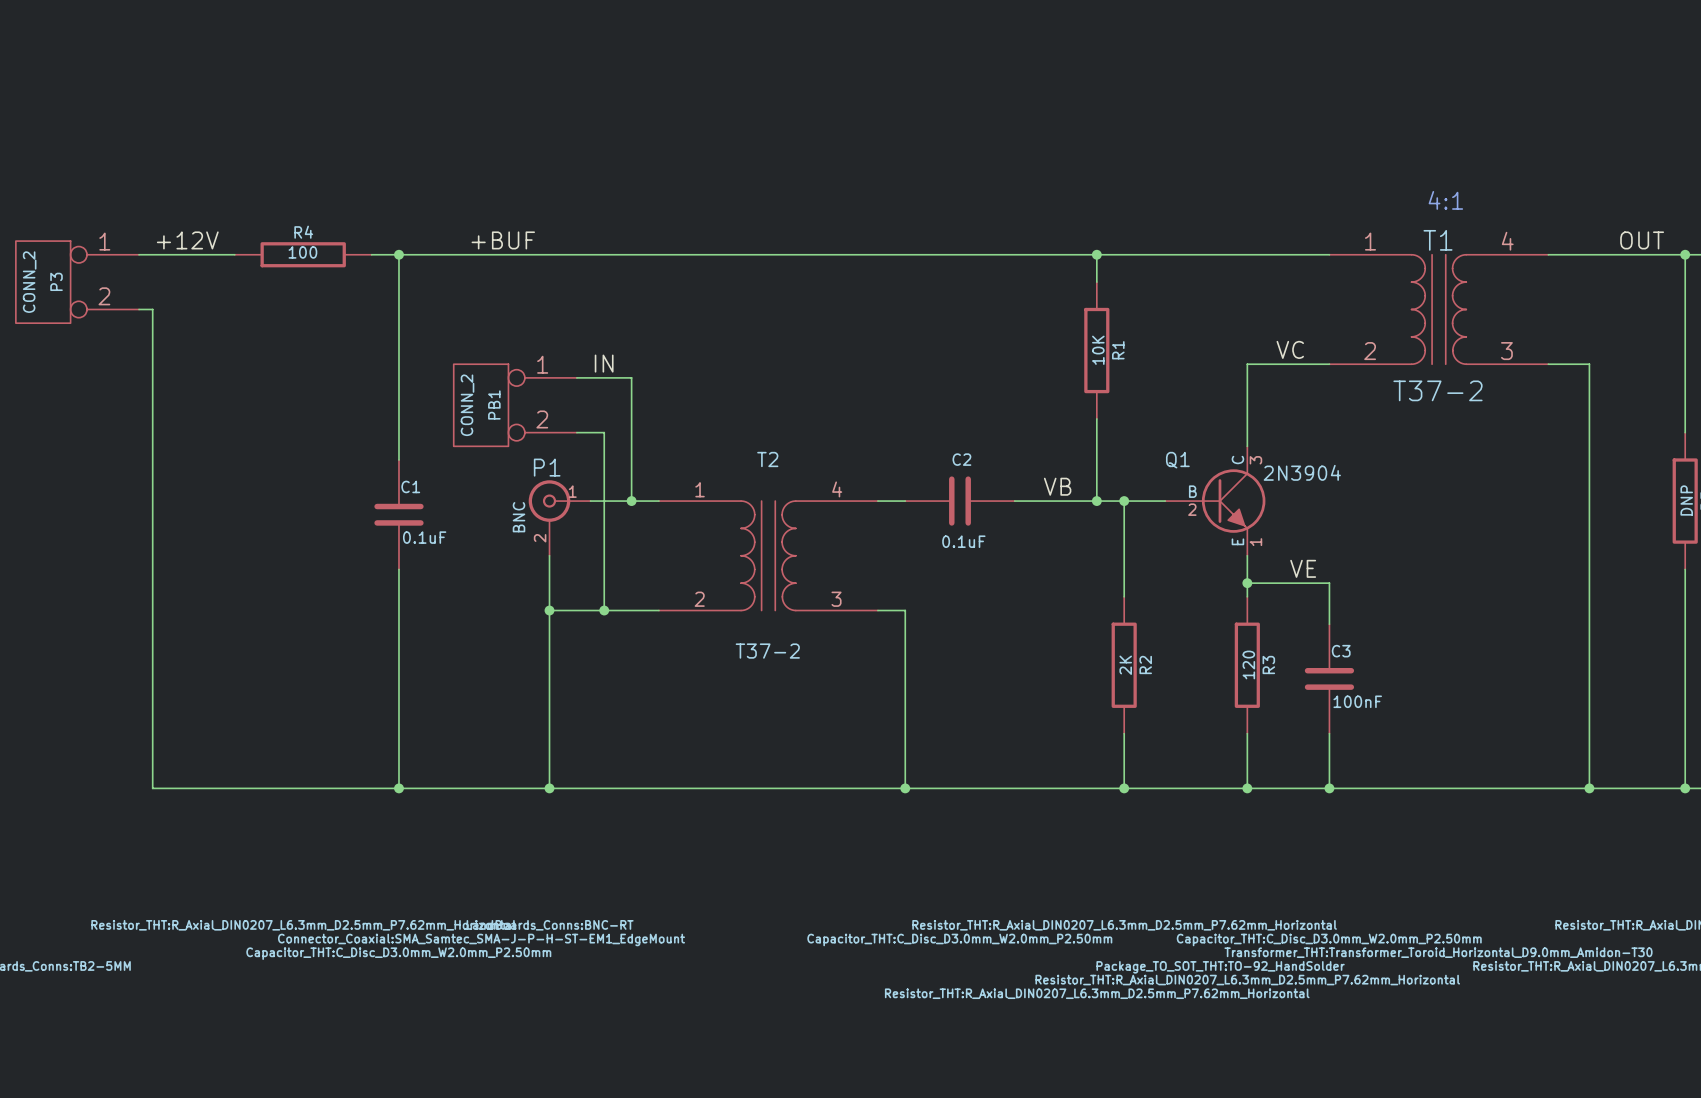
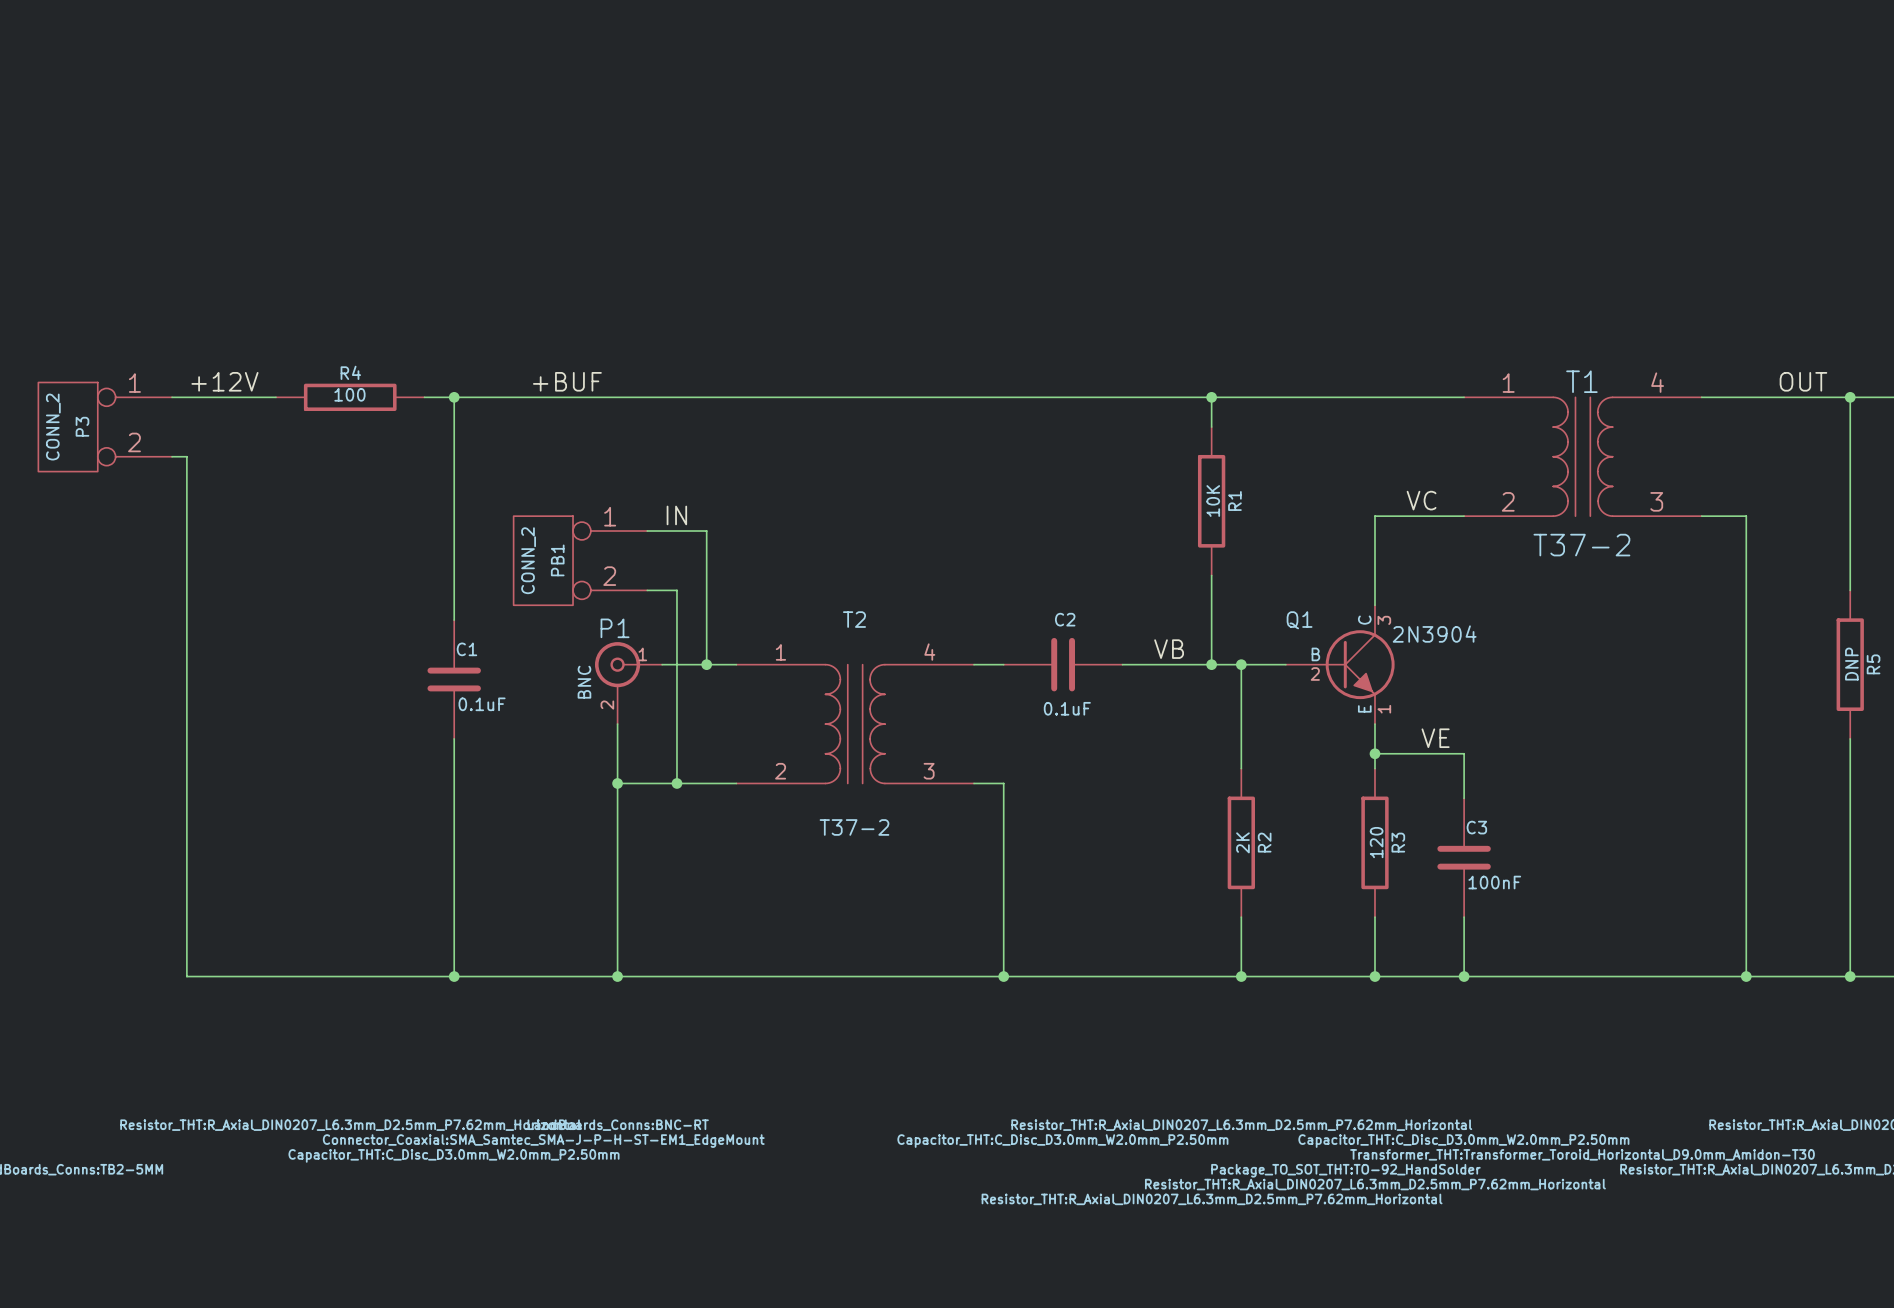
text: 4:1 (1445, 200) -> none

